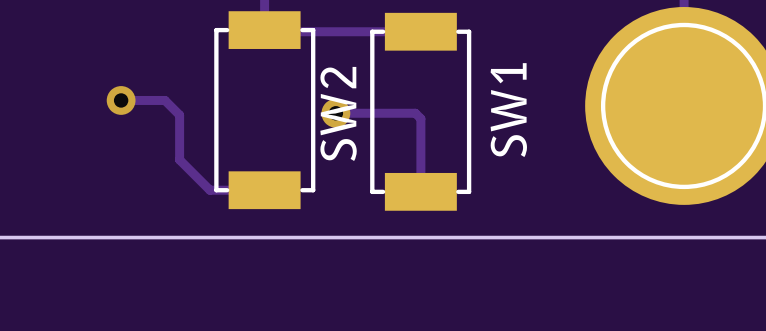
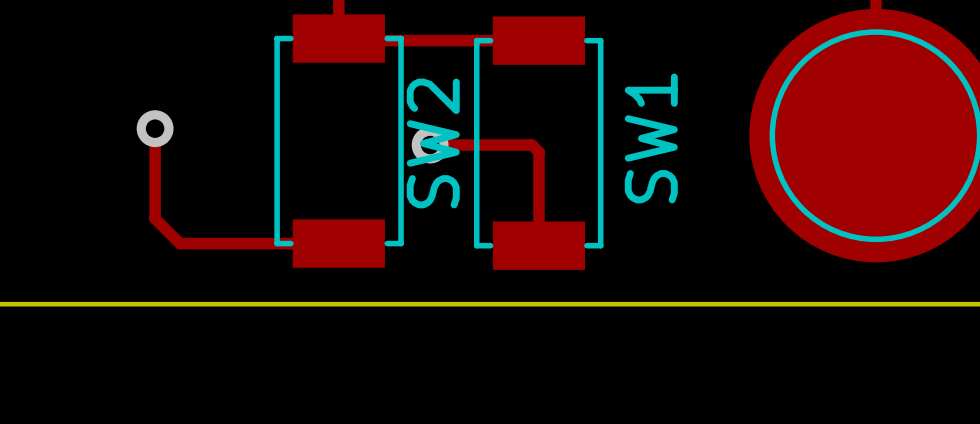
track: (121, 100) (164, 100) (179, 115) (179, 159) (209, 190) -> (155, 128) (155, 218) (179, 243) (268, 243)

